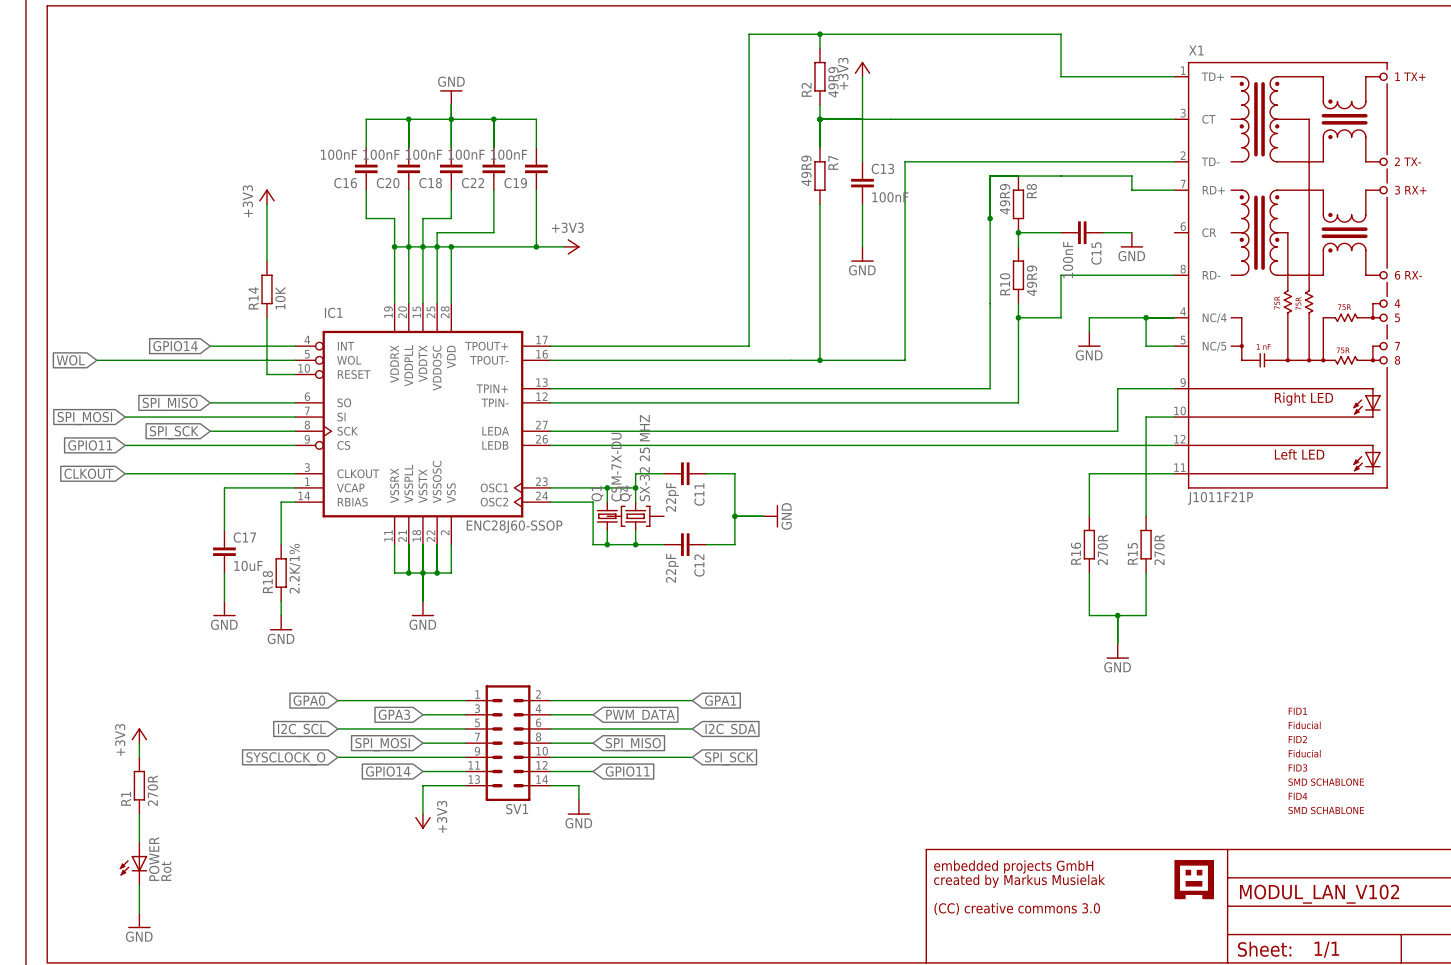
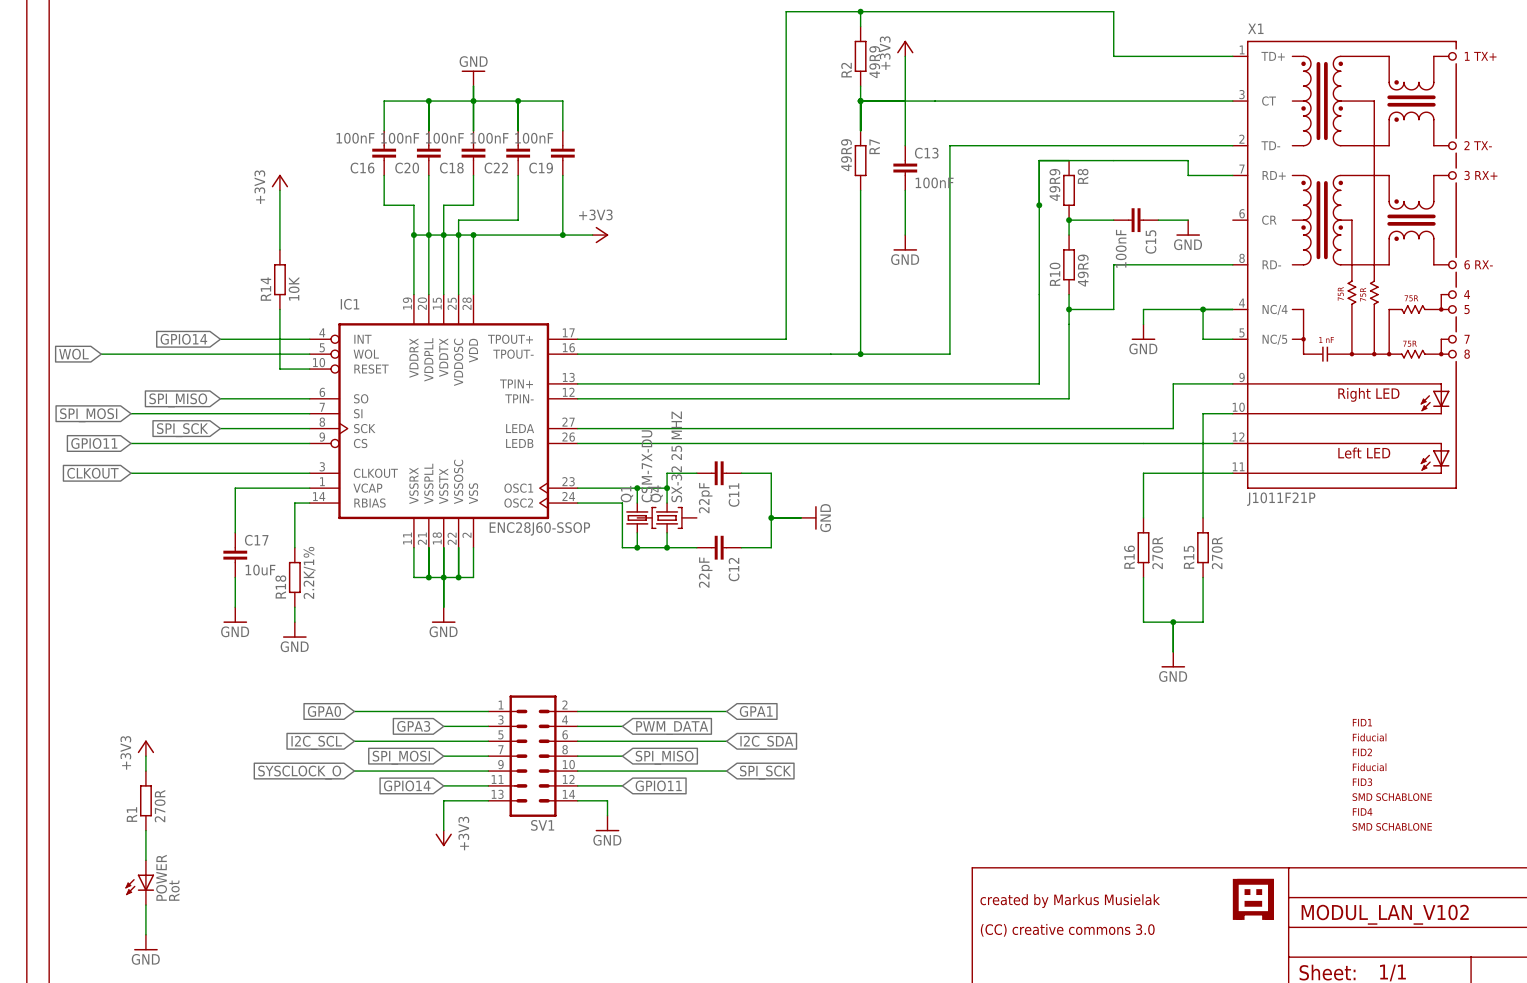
text: embedded projects GmbH (1013, 867) -> none

